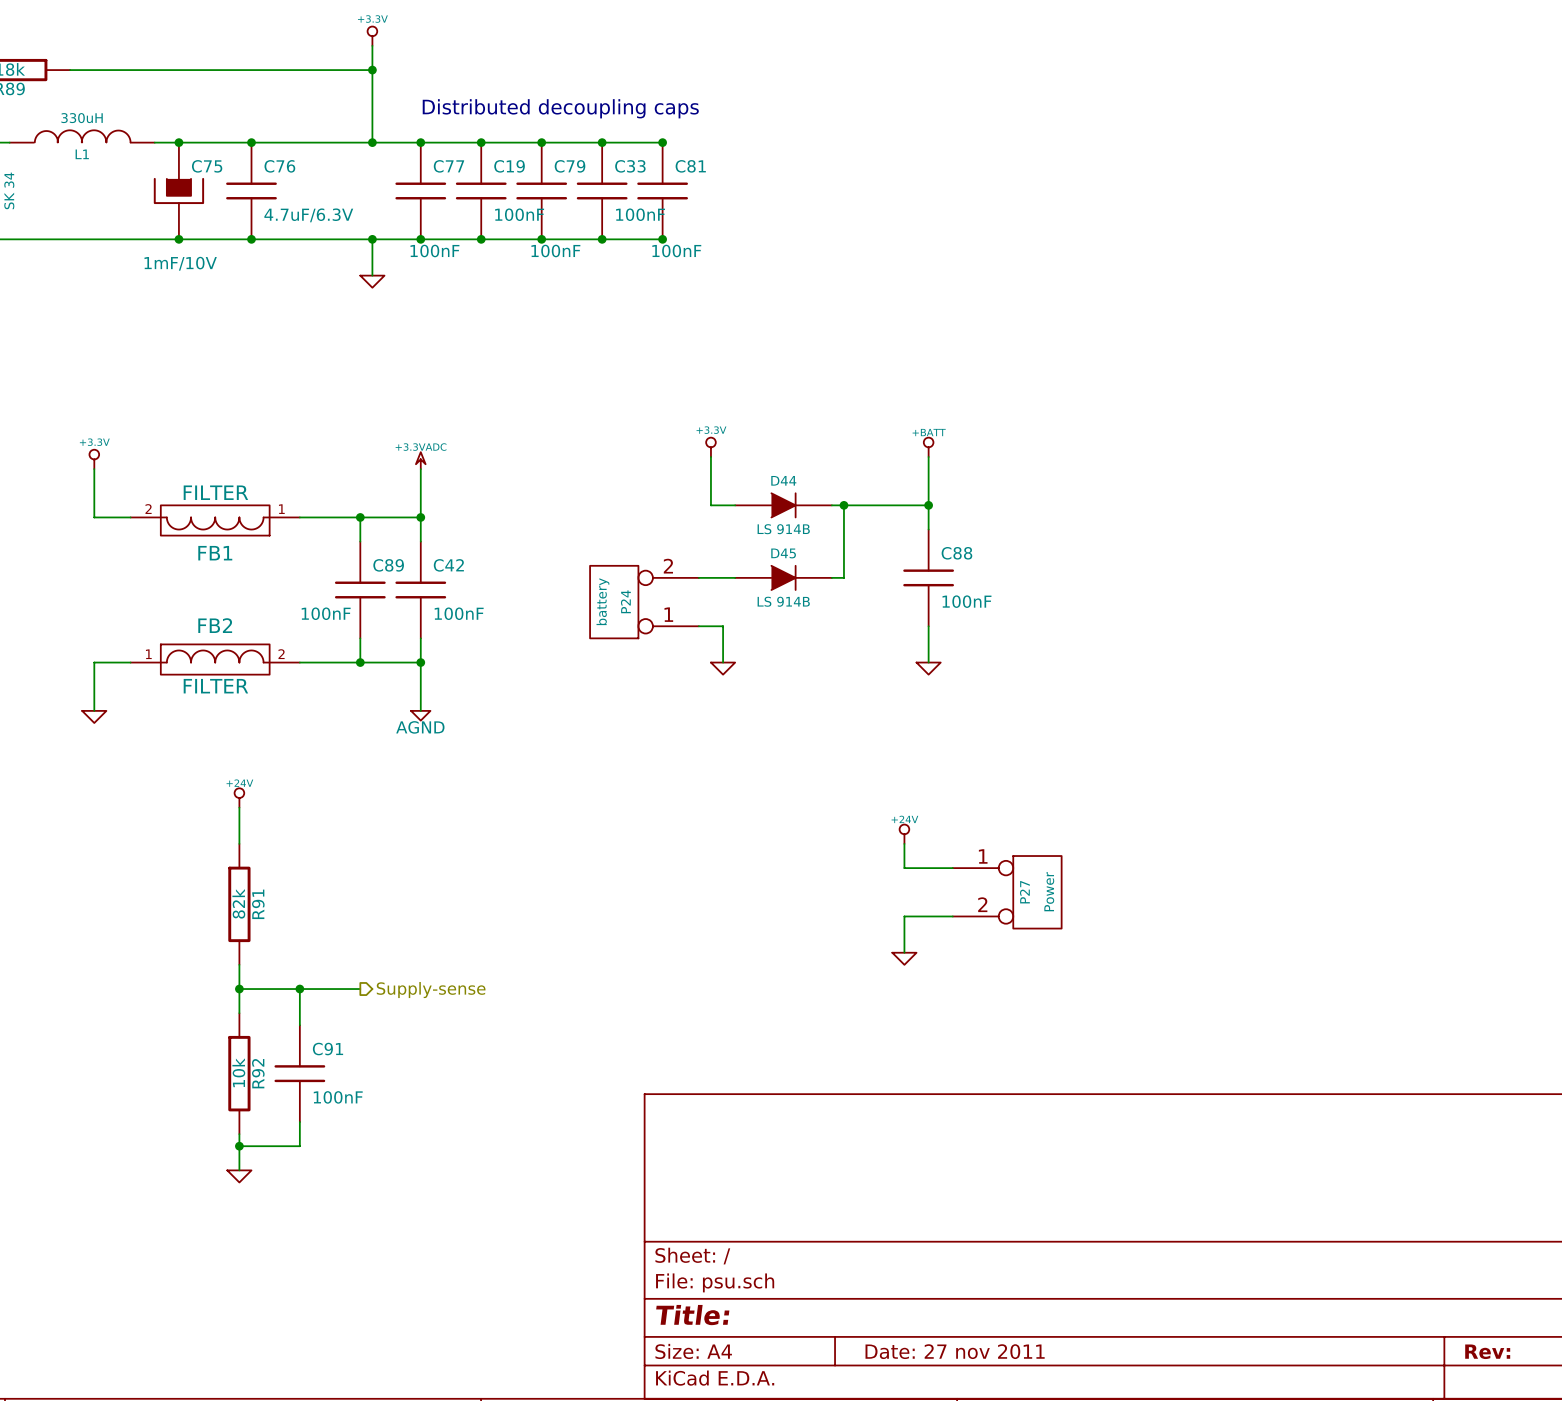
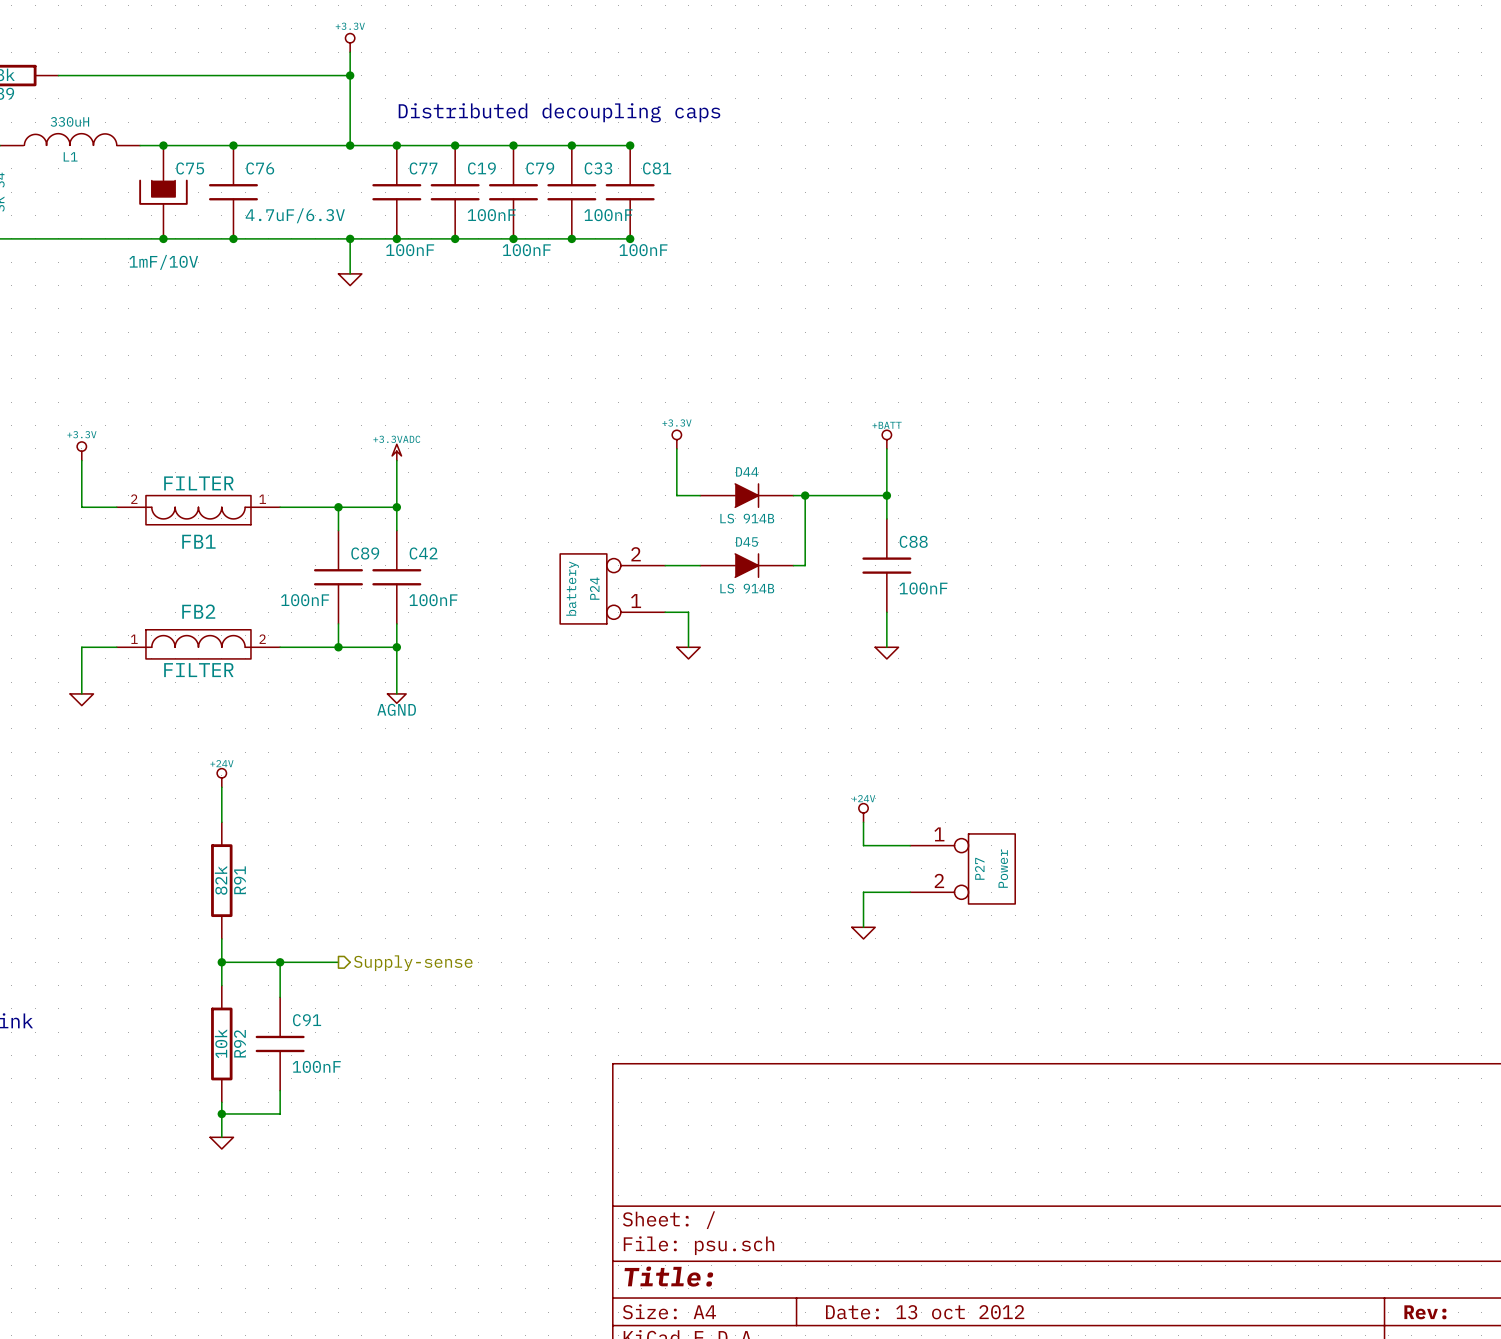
title block: Date: 27 nov 2011 (955, 1351) -> Date: 13 oct 2012 (925, 1312)

